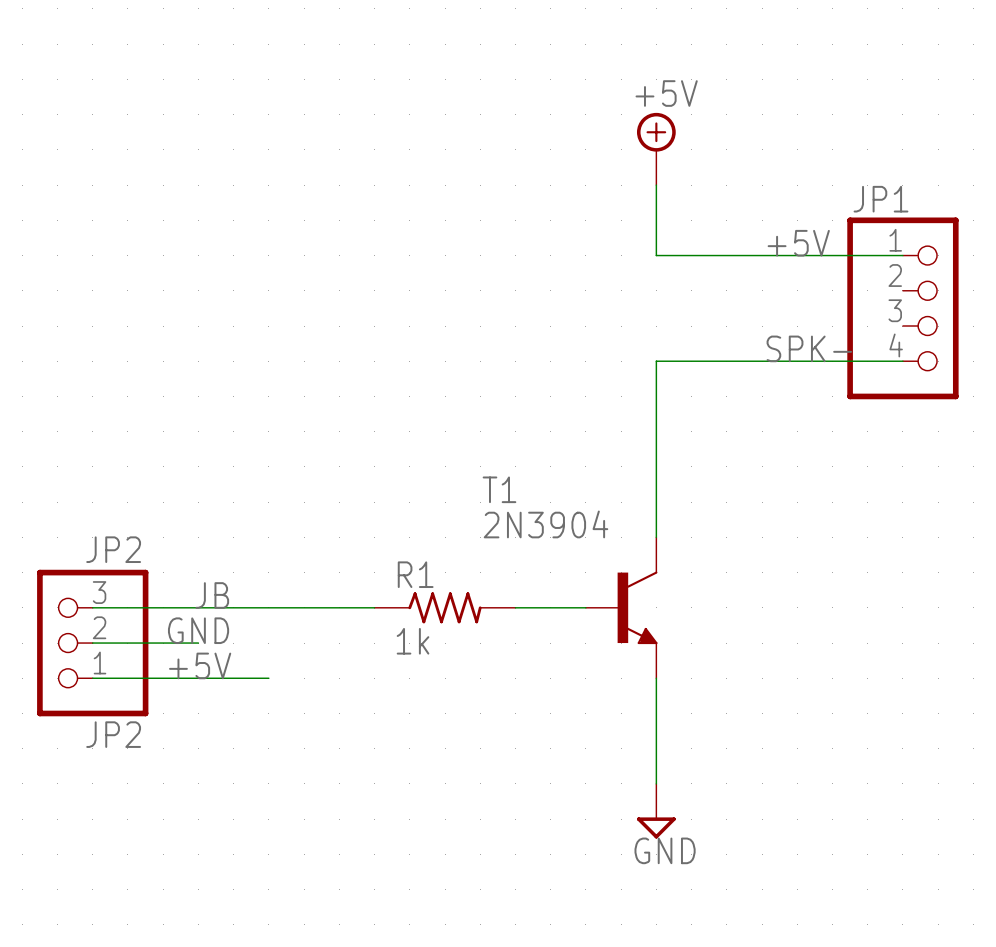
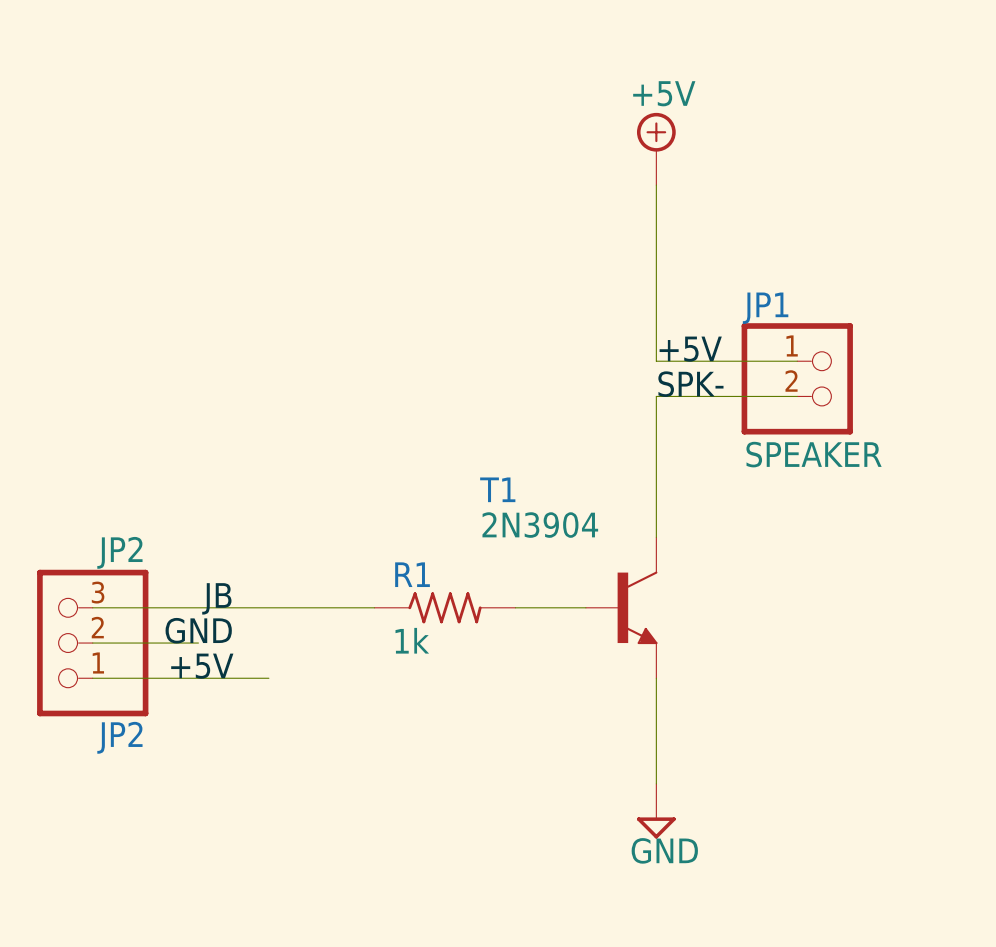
JP1 name position: JP1 (880, 199) -> JP1 (765, 308)
JP1 symbol: [847, 217, 959, 400] -> [741, 323, 853, 435]
label position: +5V (798, 243) -> +5V (690, 349)
wire: (656, 255) (902, 255) -> none
label position: SPK- (809, 348) -> SPK- (690, 384)
wire: (656, 361) (656, 396) -> (656, 361) (656, 255)
wire: (797, 361) (902, 361) -> none
wire: none -> (656, 396) (797, 396)
JP1 value: none -> SPEAKER (814, 454)

